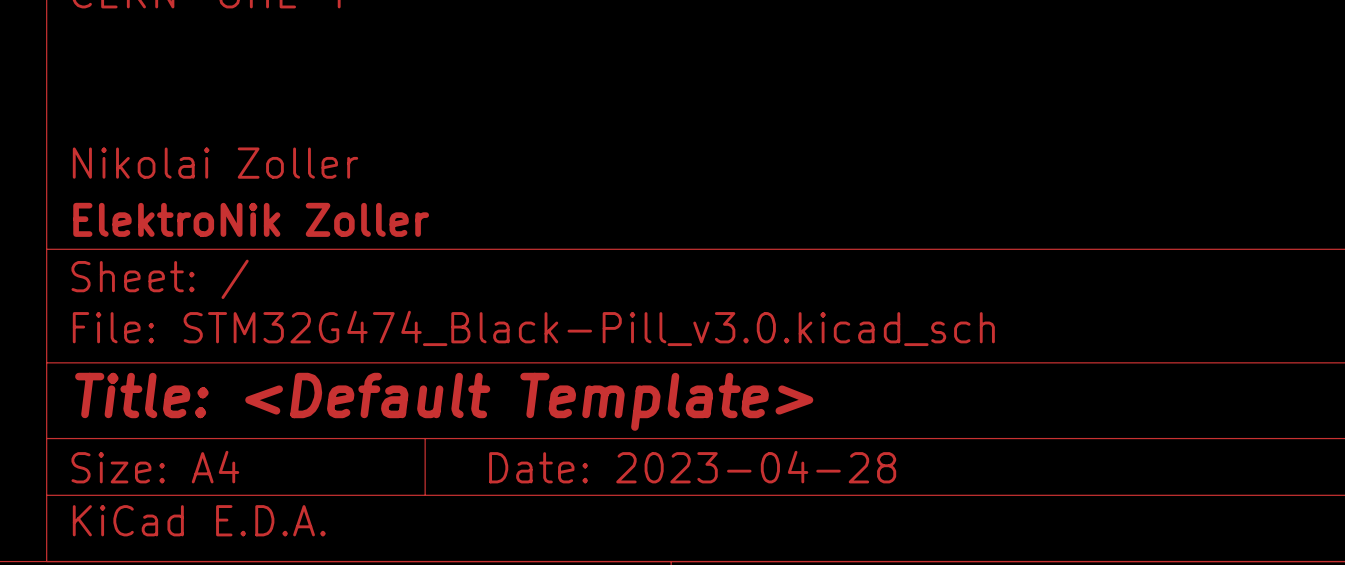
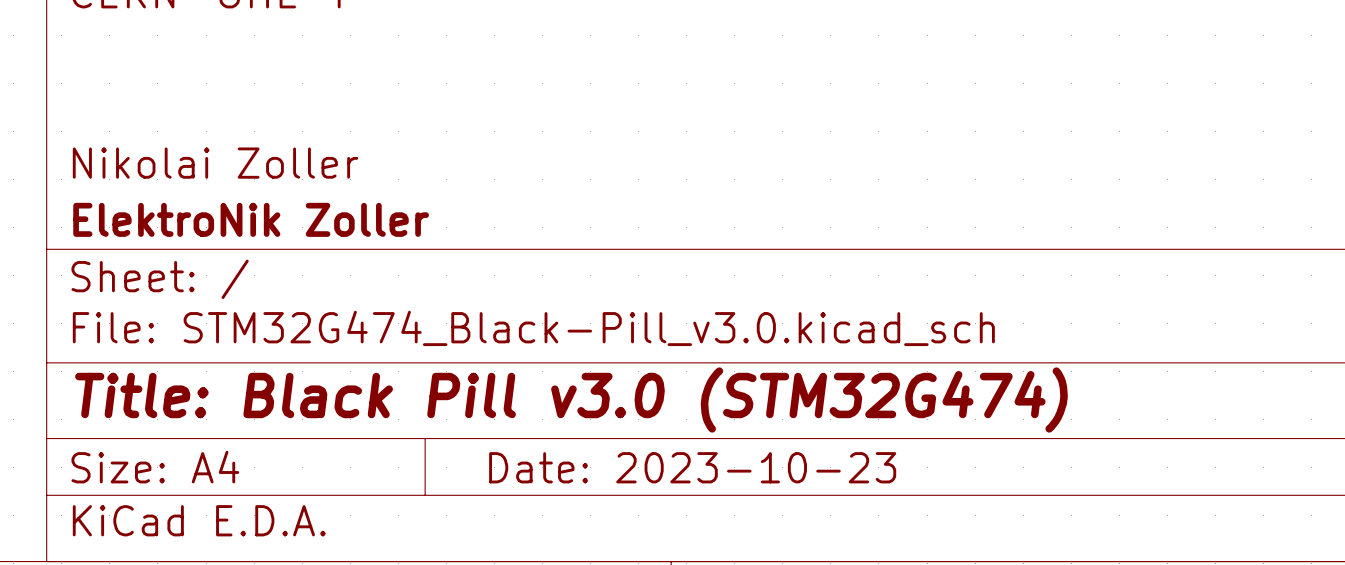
title block: Title: <Default Template> (444, 401) -> Title: Black Pill v3.0 (STM32G474) (571, 400)
title block: Date: 2023-04-28 (692, 467) -> Date: 2023-10-23 (692, 467)

